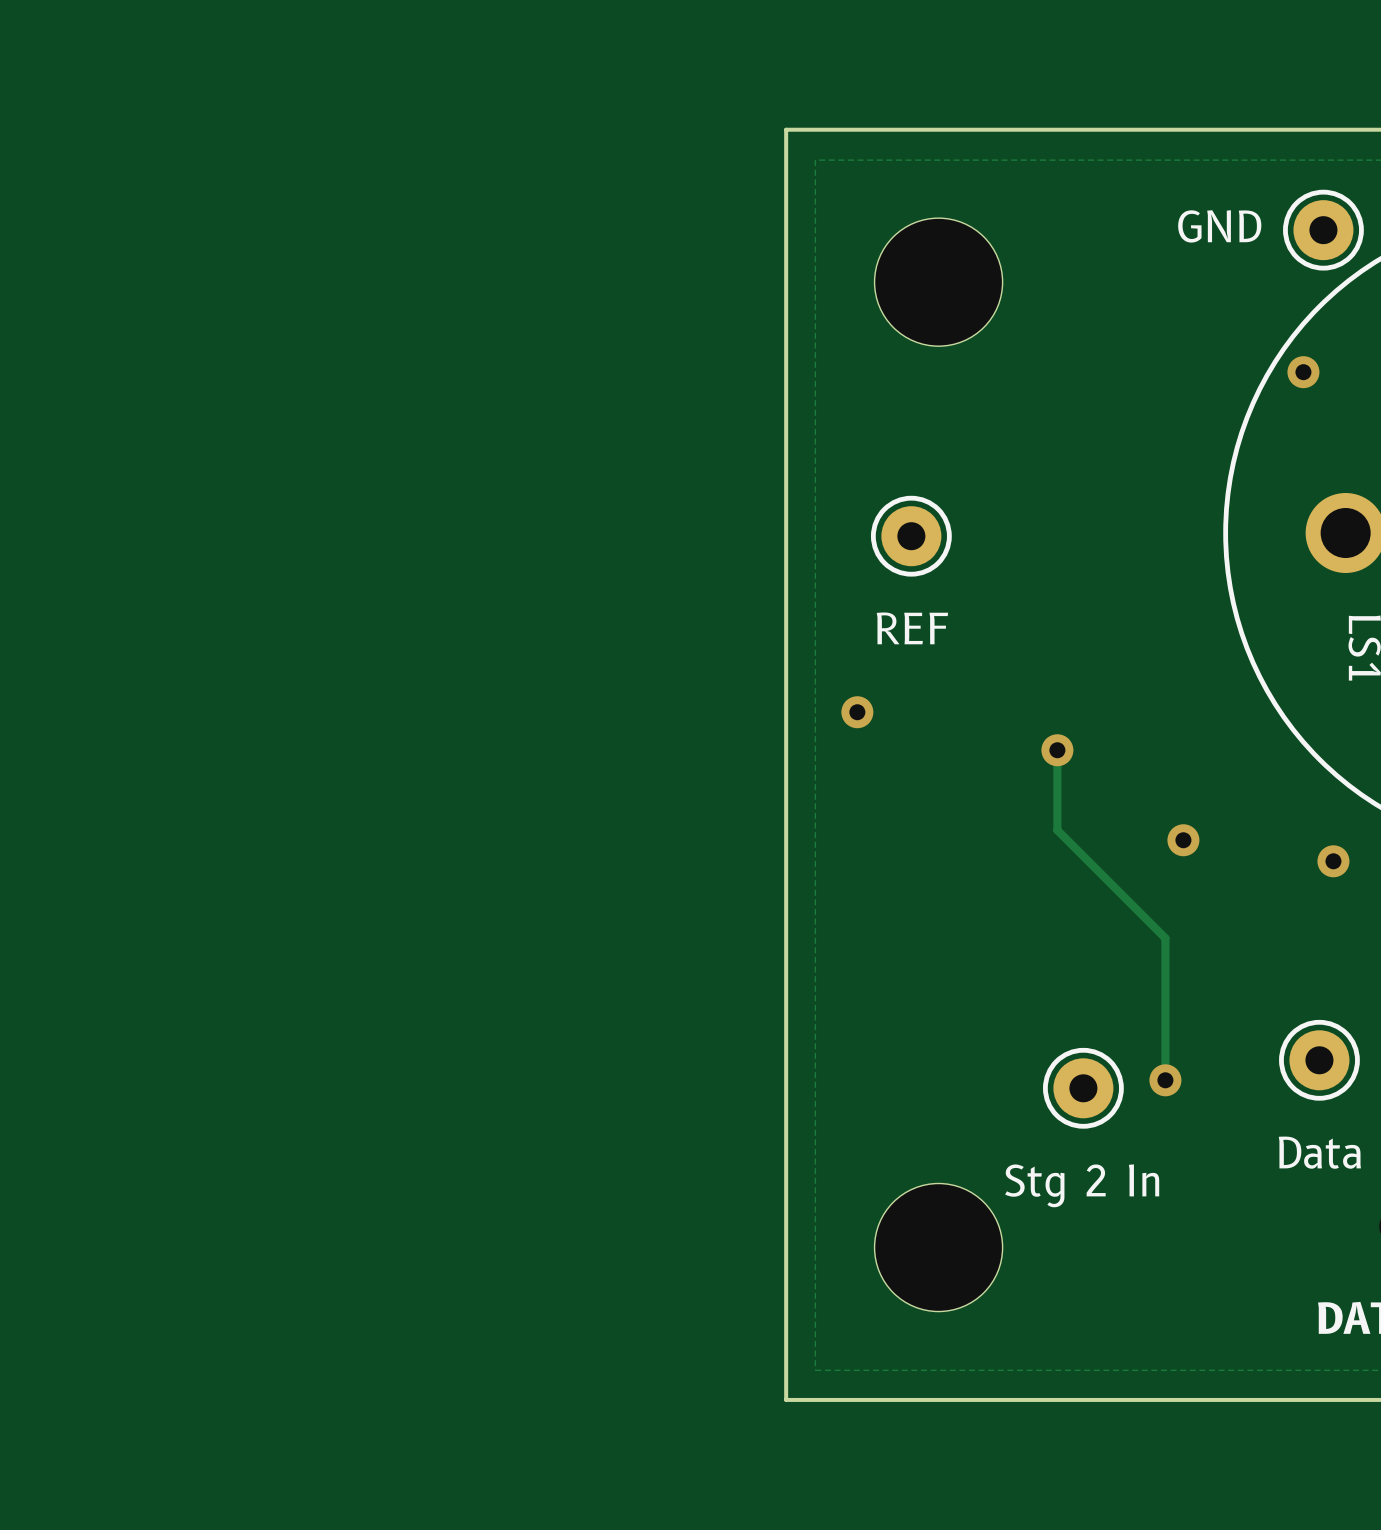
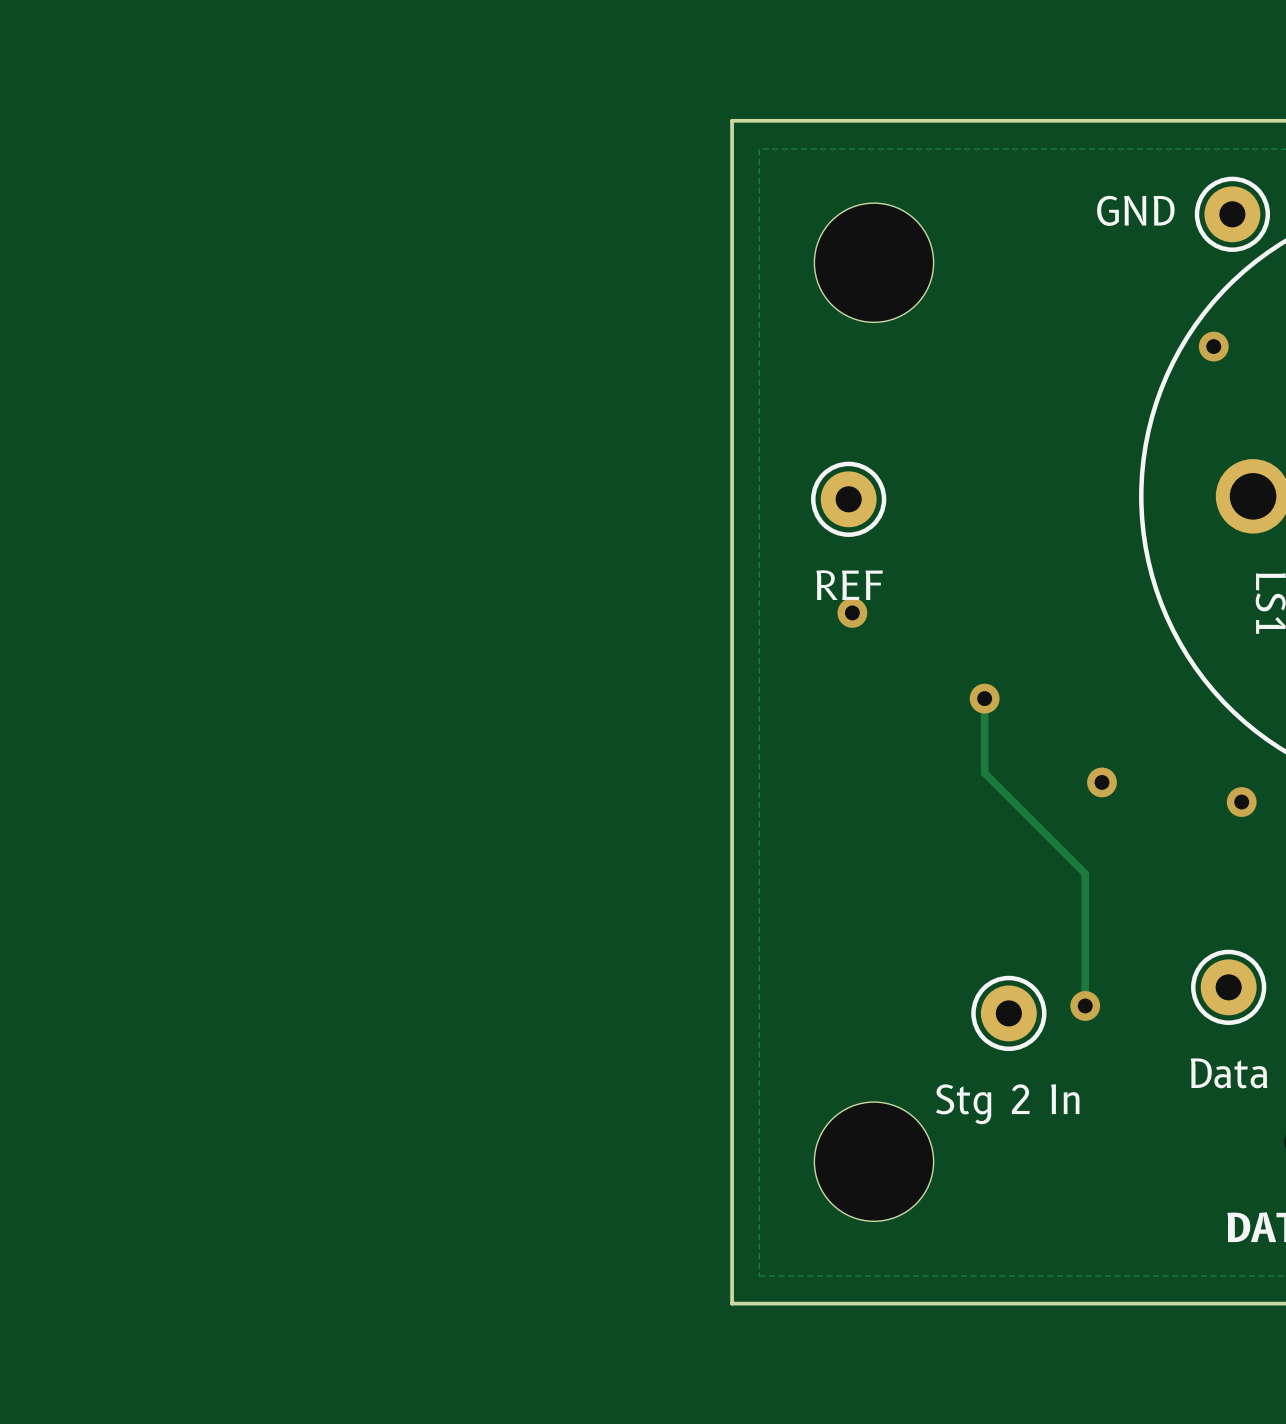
via position: (857, 712) -> (852, 612)

